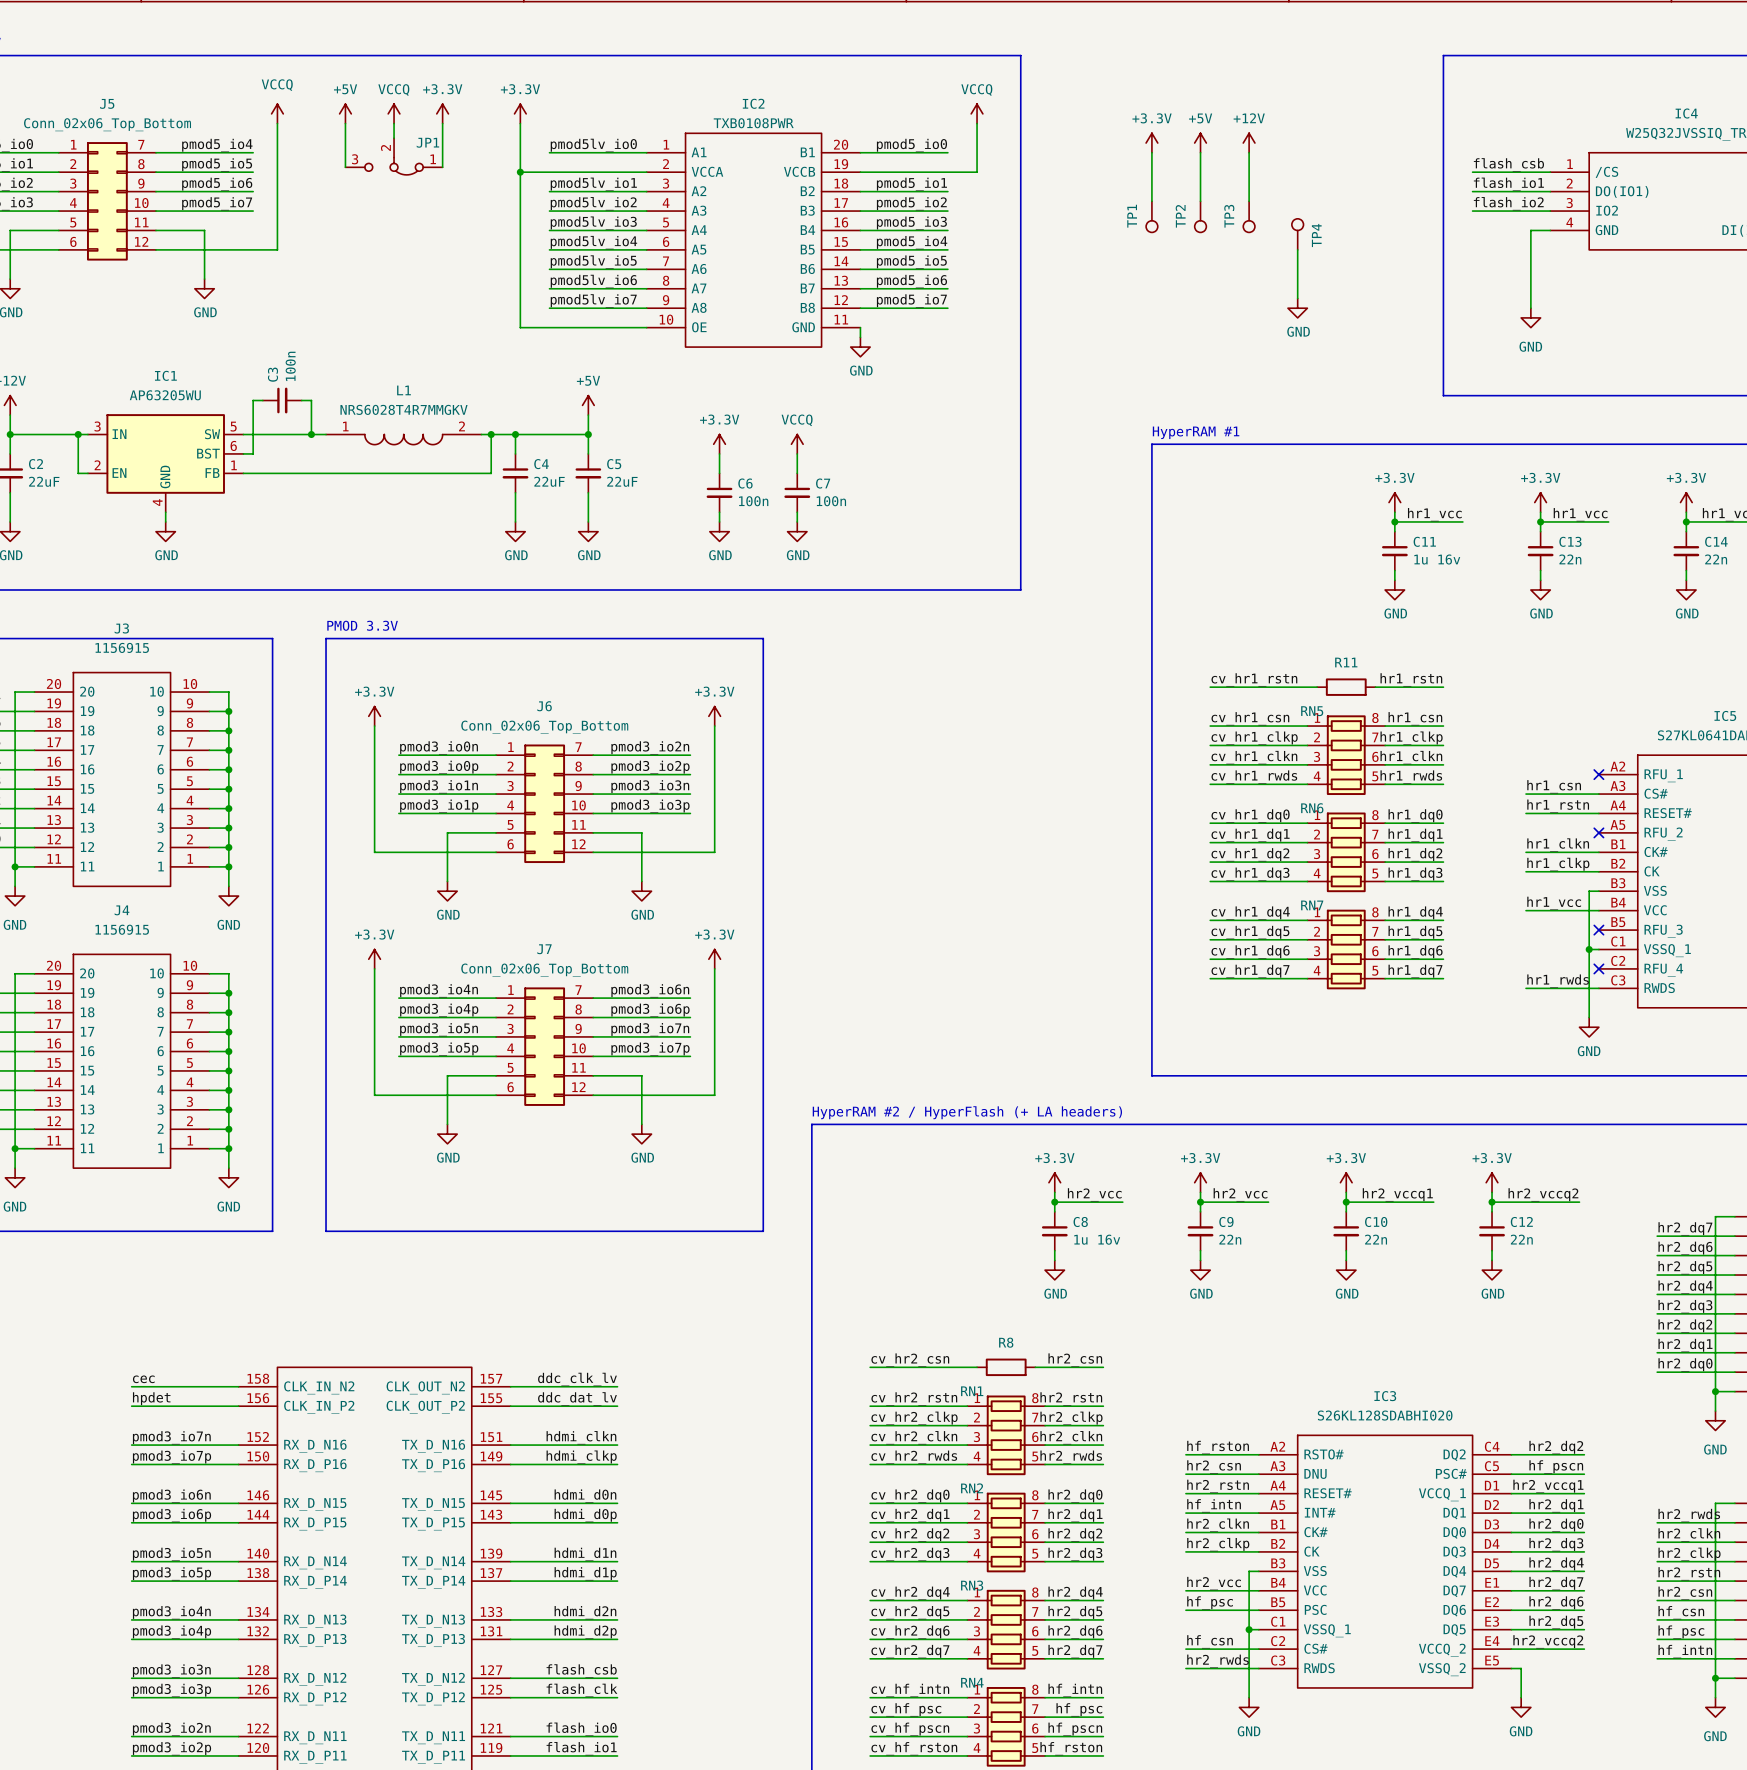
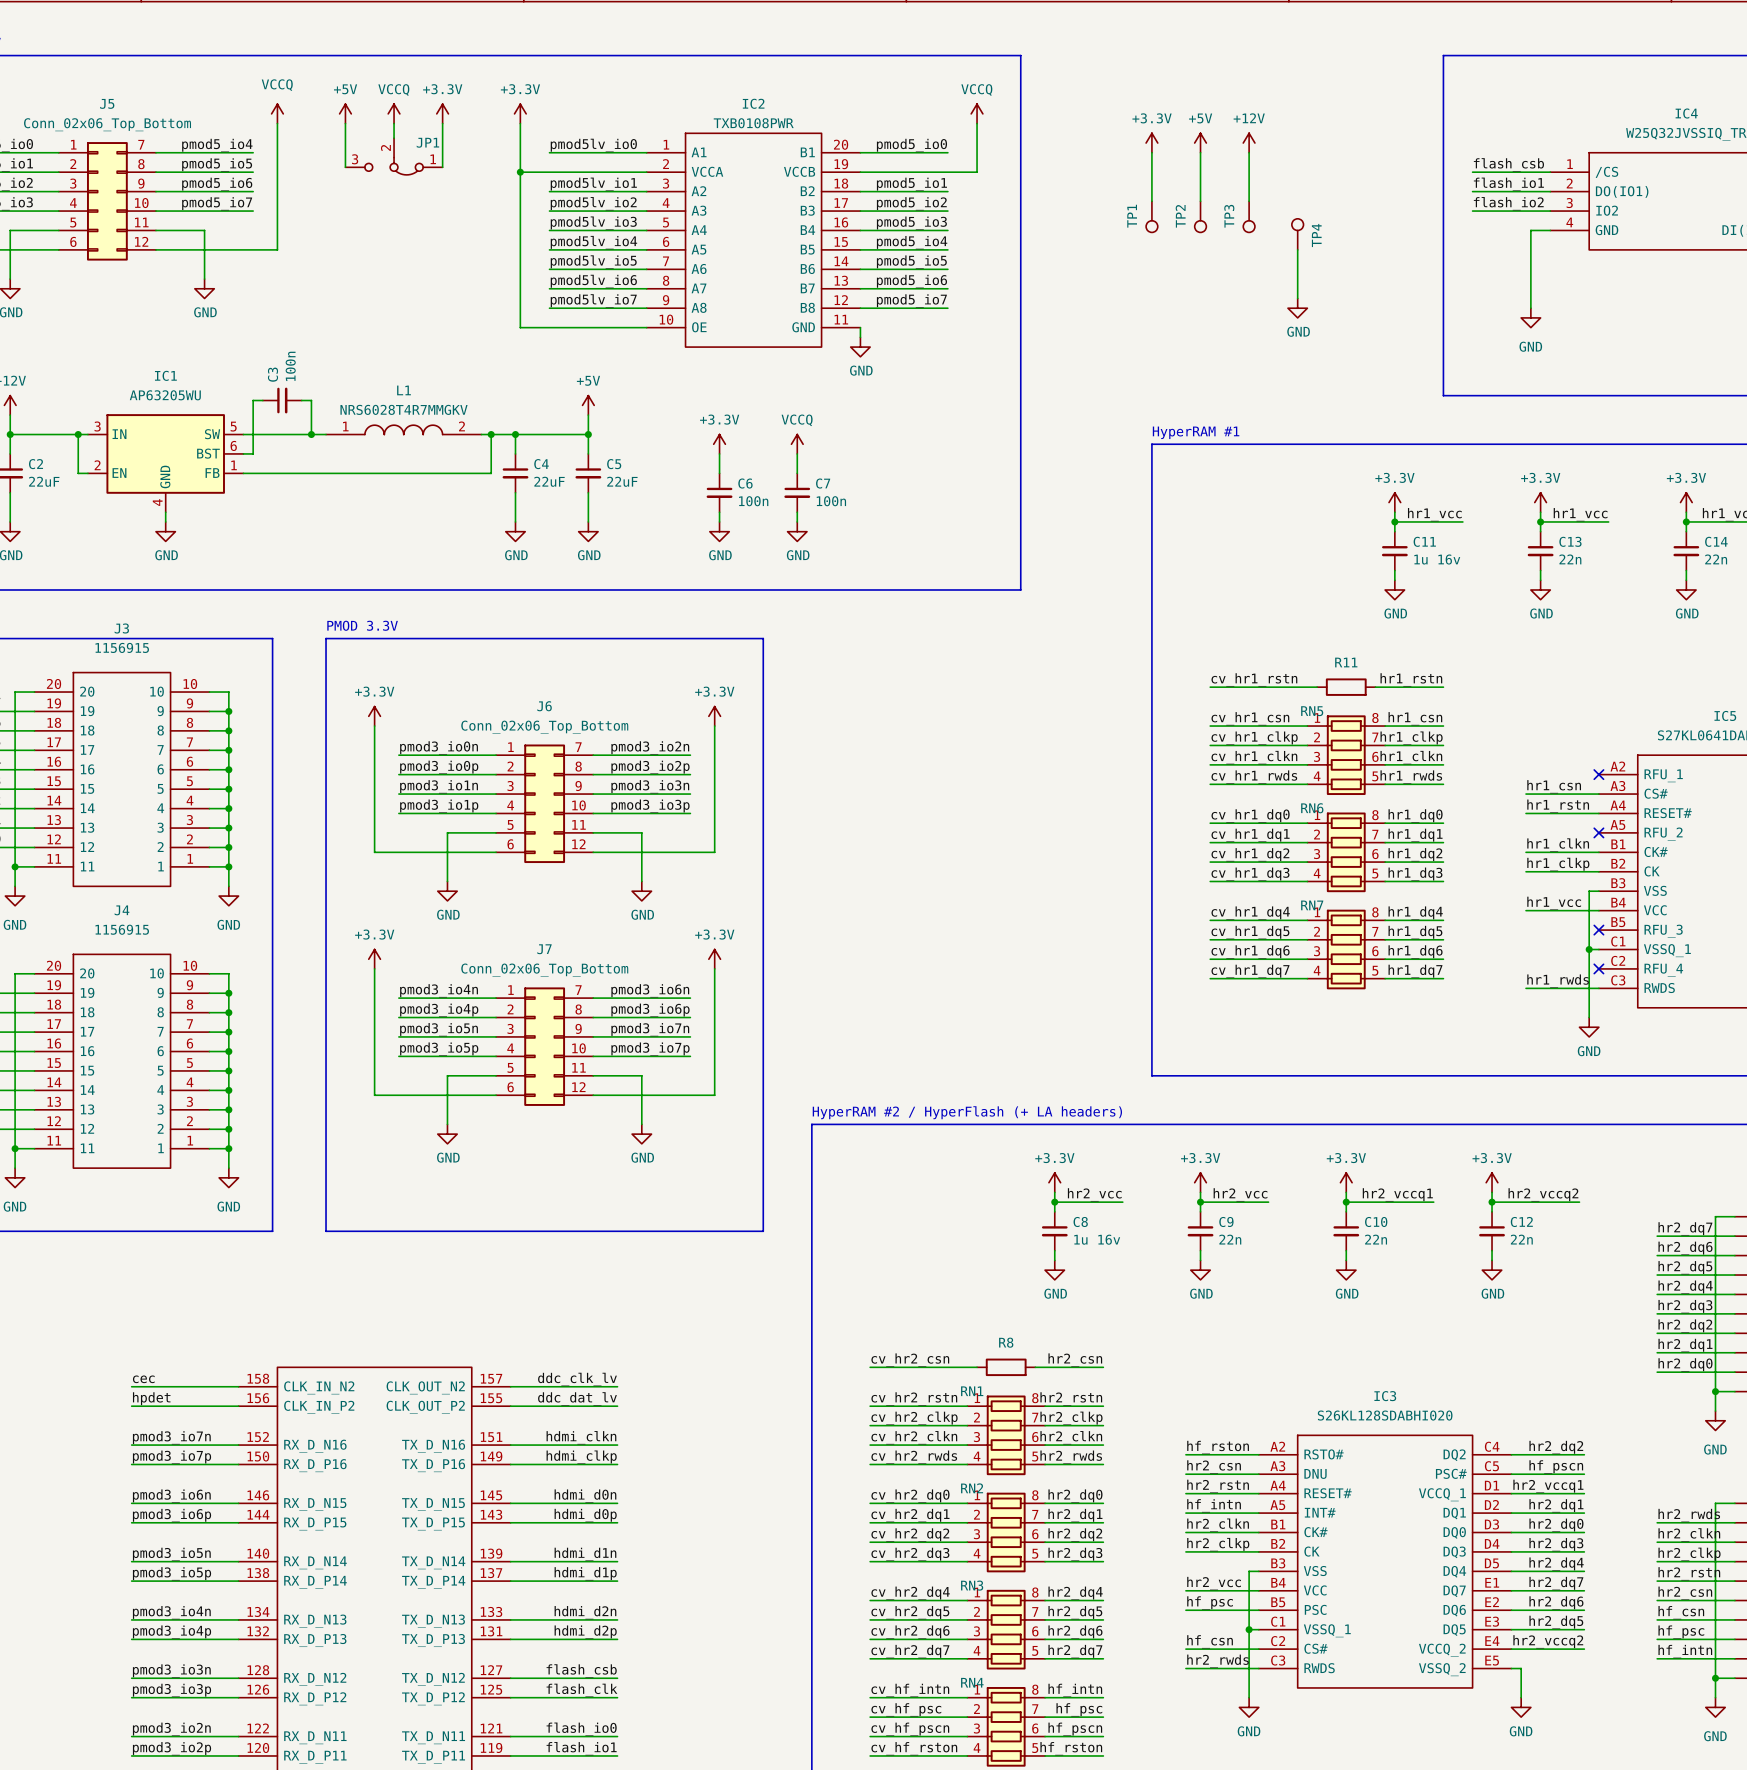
L1 symbol: [326, 433, 482, 446] -> [326, 424, 482, 436]

